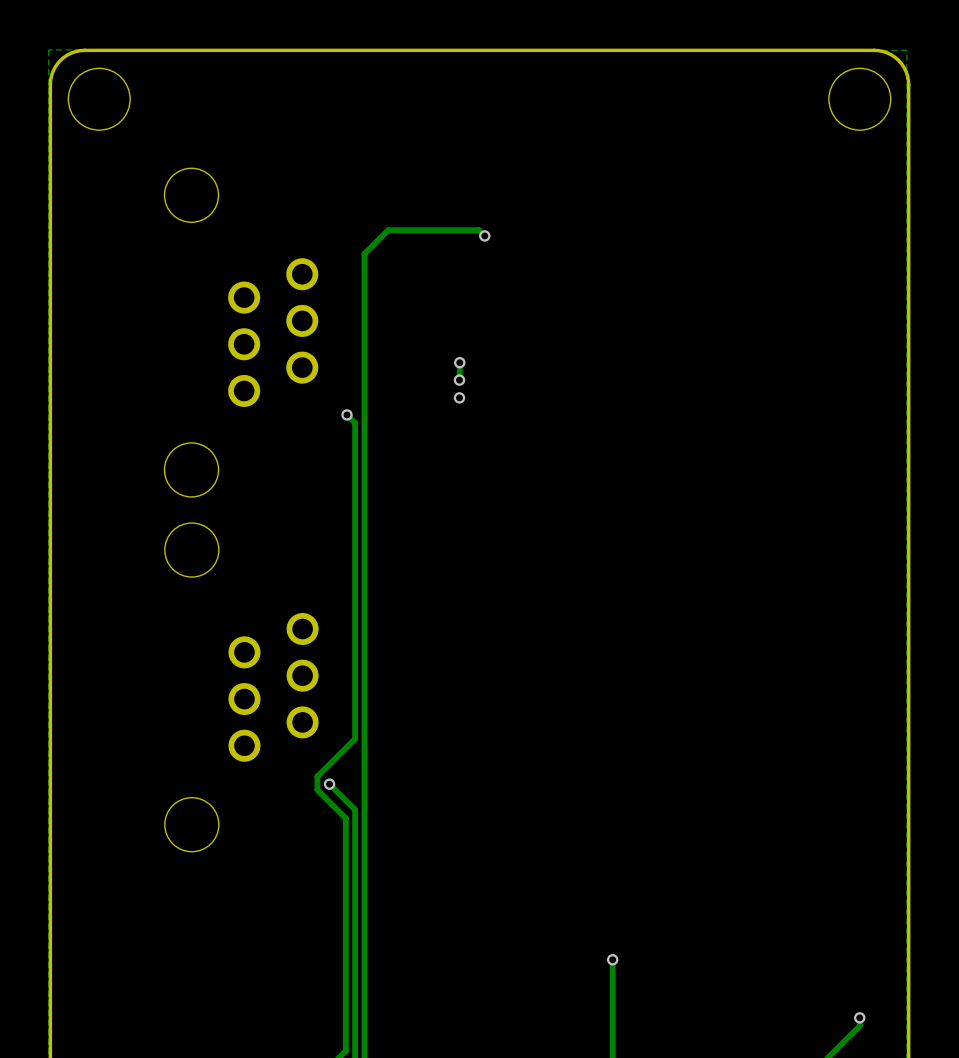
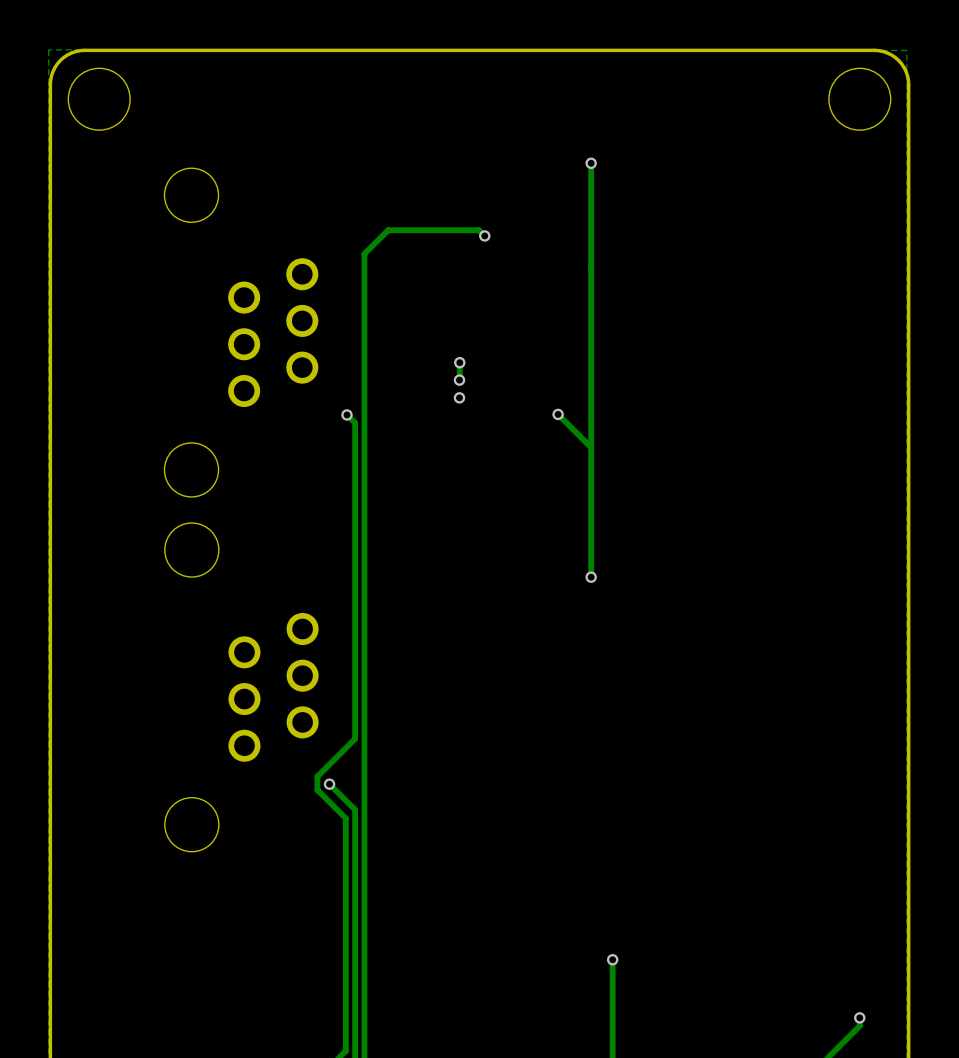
track: none -> (591, 163) (590, 576)
via: none -> (591, 163)
track: none -> (558, 414) (591, 447)
via: none -> (558, 414)
via: none -> (591, 577)

